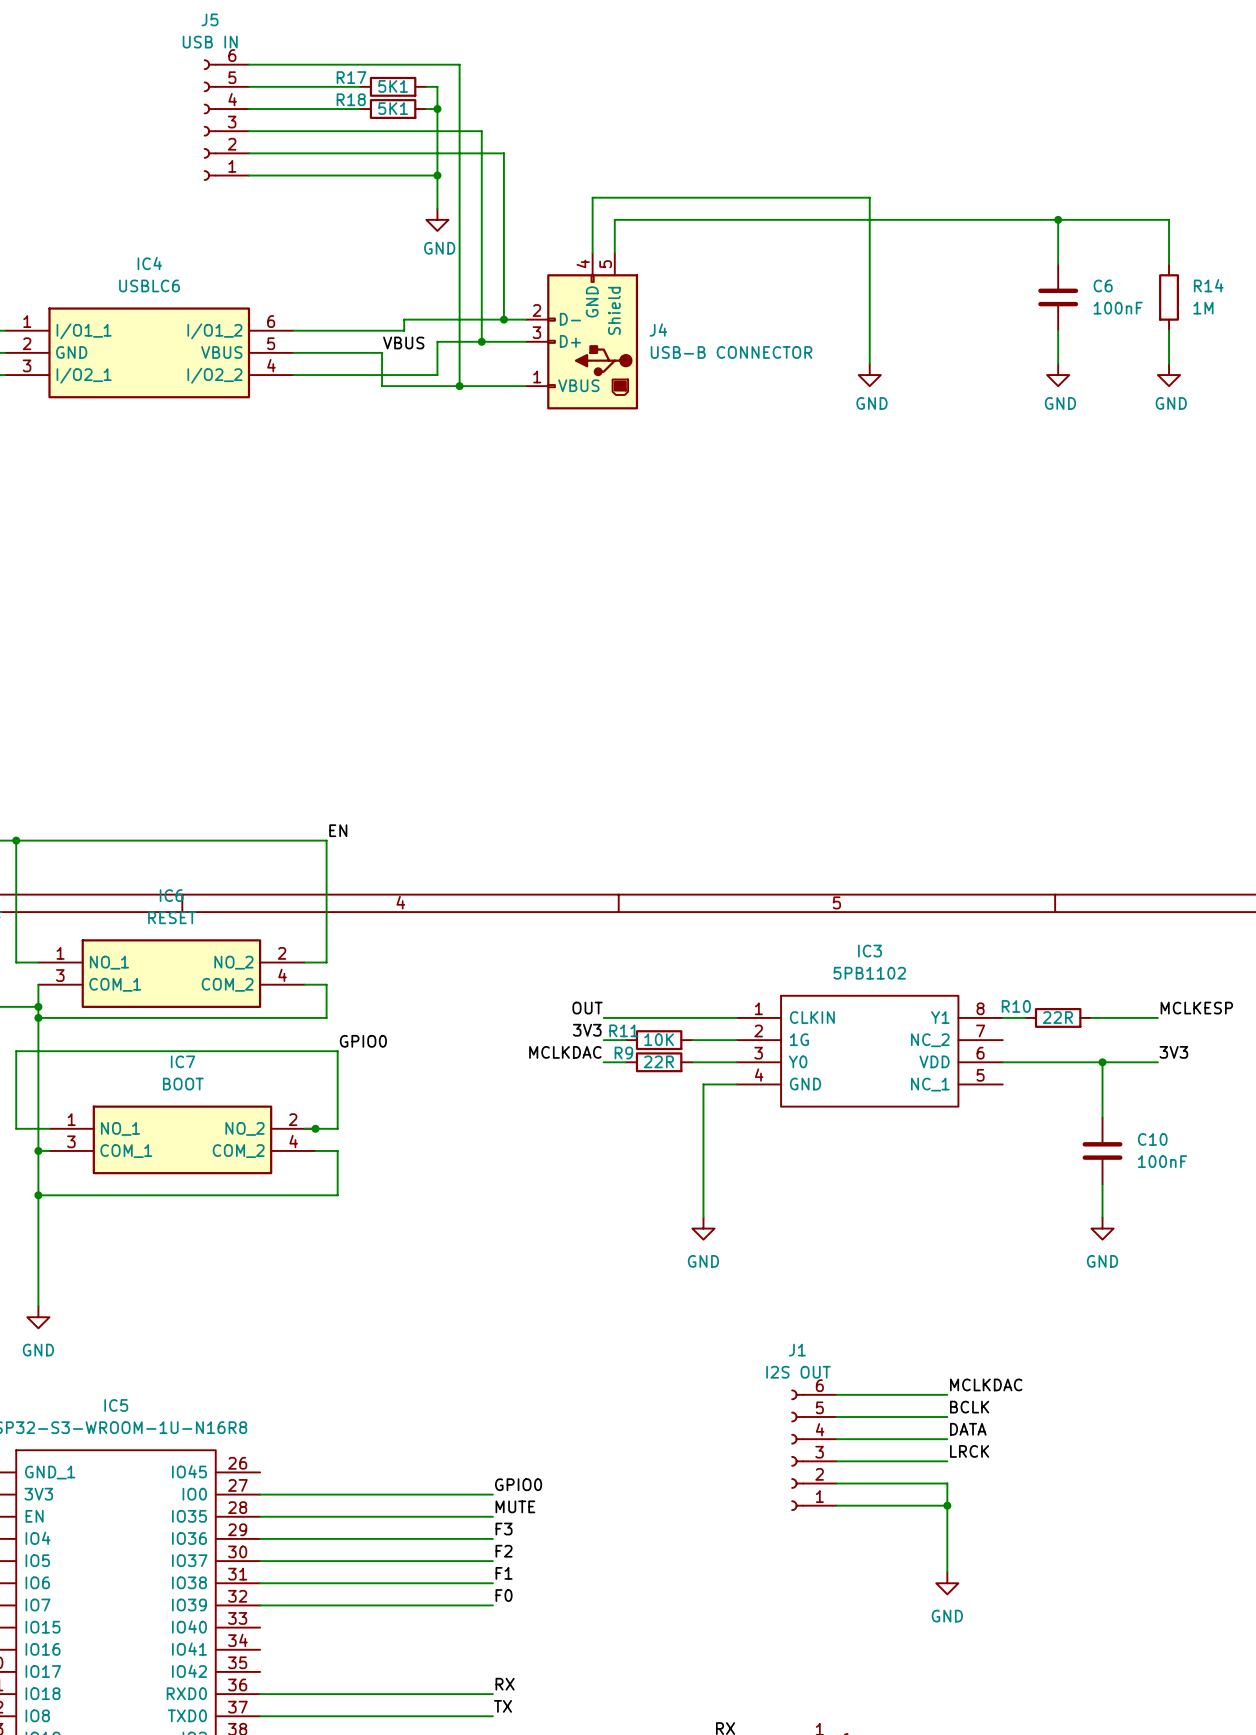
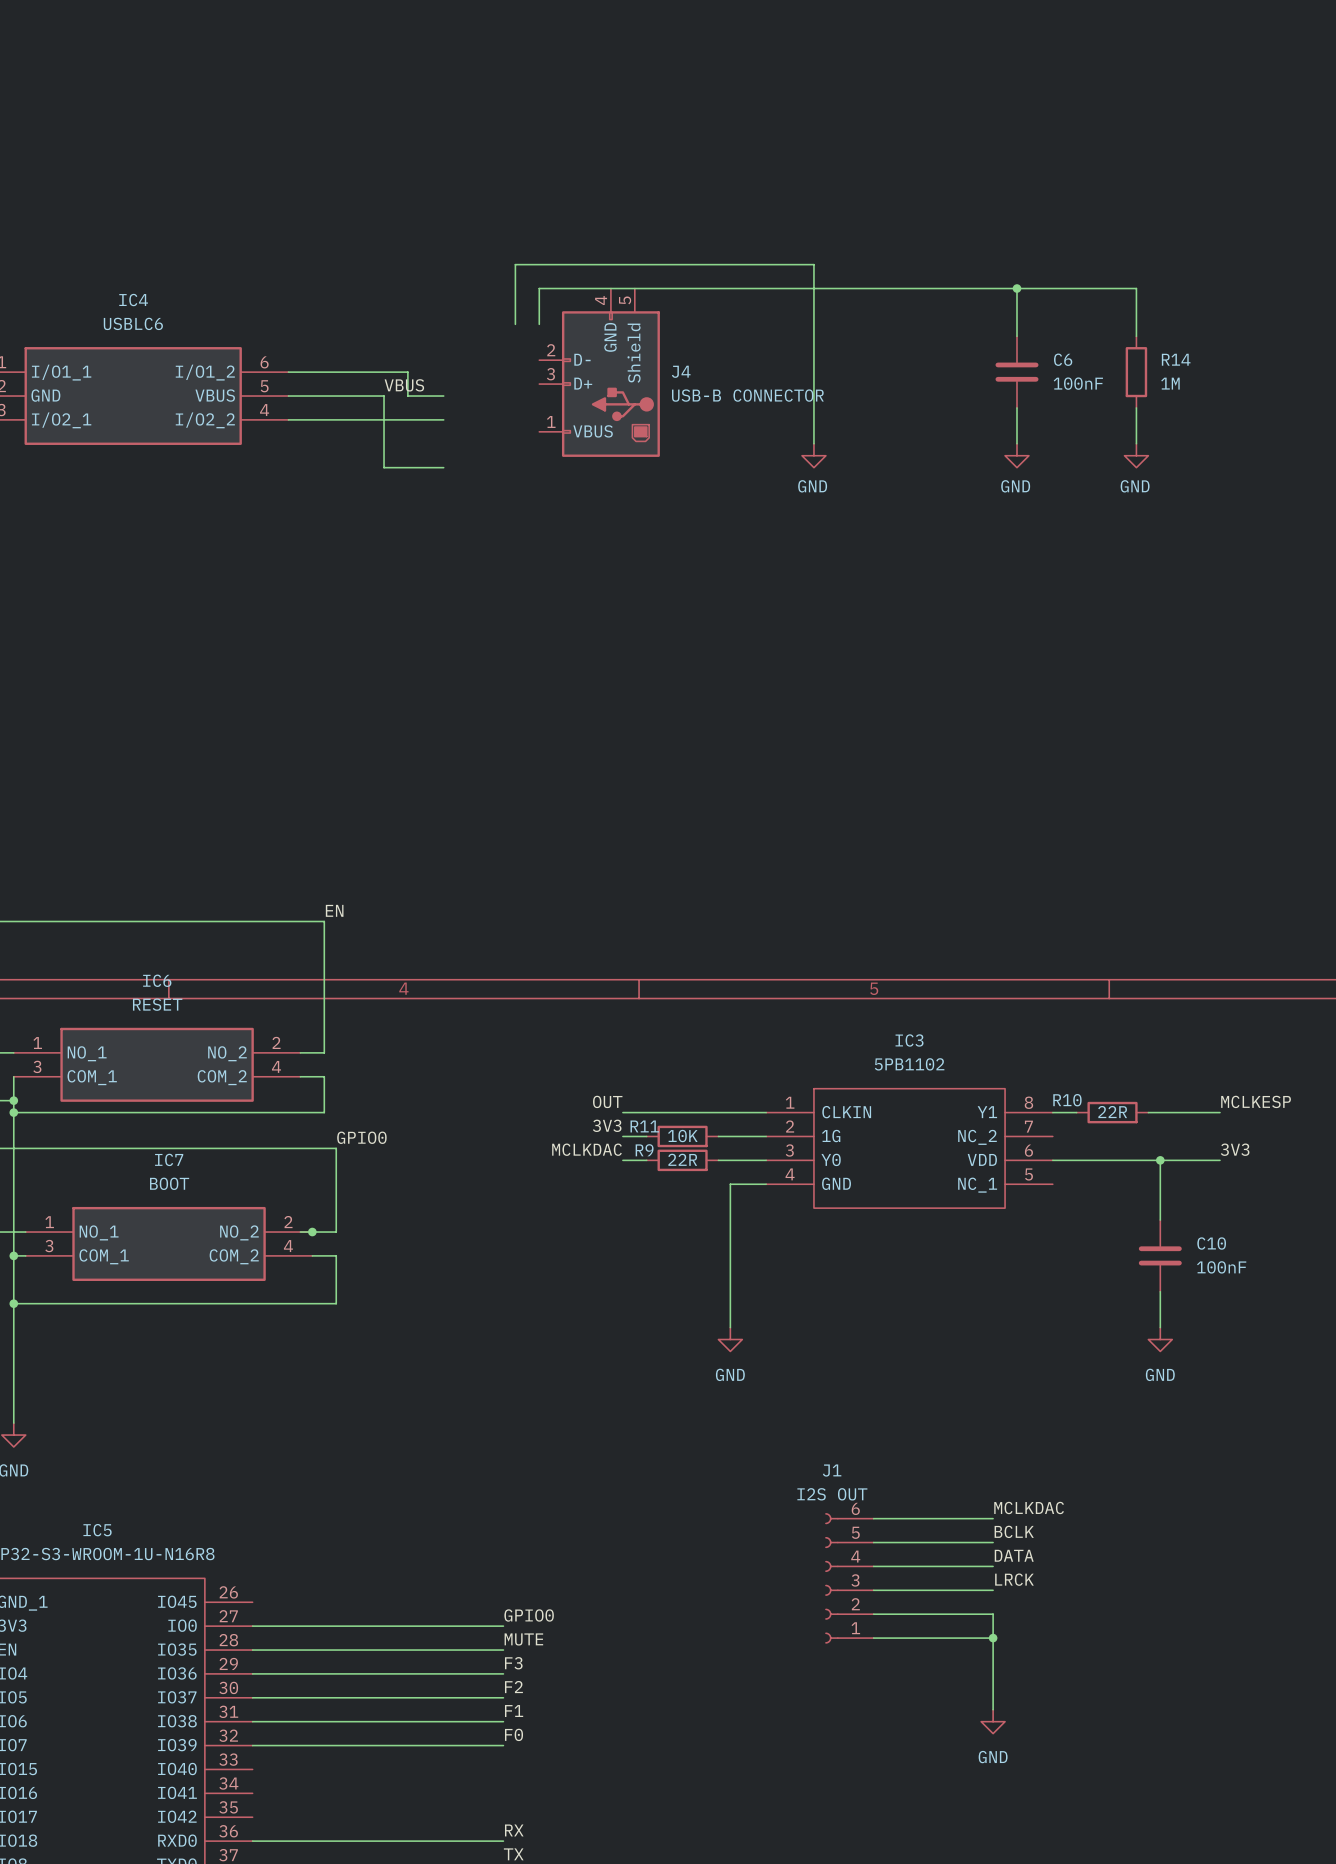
wire: (249, 64) (459, 64) (459, 386) -> none
wire: (249, 86) (359, 86) -> none
R17: 5K1 (393, 86) -> none
wire: (426, 86) (437, 86) (437, 208) -> none
wire: (249, 109) (359, 109) -> none
R18: 5K1 (393, 109) -> none
wire: (426, 109) (437, 109) -> none
junction: (437, 109) -> none
J5: USB IN (226, 120) -> none
wire: (249, 131) (481, 131) (481, 341) -> none
wire: (249, 153) (503, 153) (503, 230) -> (813, 443) (813, 264) (515, 264)
wire: (249, 175) (437, 175) -> none
junction: (437, 175) -> none
power symbol: GND (437, 219) -> none
wire: (1058, 219) (1058, 264) -> (1016, 288) (1016, 336)
junction: (1058, 219) -> none
wire: (592, 253) (592, 197) (869, 197) (869, 363) -> none
wire: (614, 253) (614, 219) (1169, 219) (1169, 264) -> (539, 324) (539, 288) (1136, 288) (1136, 336)
junction: none -> (1016, 288)
wire: (503, 286) (503, 319) -> none
C6 position: (1058, 297) -> (1016, 372)
R14 position: (1169, 297) -> (1136, 372)
junction: (503, 319) -> none
wire: (526, 319) (404, 319) (404, 330) -> (443, 396) (407, 396) (407, 372)
wire: (1058, 330) (1058, 363) -> (1016, 407) (1016, 443)
wire: (1169, 330) (1169, 363) -> (1136, 407) (1136, 443)
junction: (481, 341) -> none
wire: (526, 341) (437, 341) (437, 375) -> none
power symbol: GND (869, 375) -> none
power symbol position: GND (1058, 375) -> GND (1136, 455)
power symbol: GND (1169, 375) -> none
wire: (382, 386) (526, 386) -> (384, 431) (384, 467) (443, 467)
junction: (459, 386) -> none
power symbol: none -> GND (813, 455)
power symbol: none -> GND (1016, 455)

